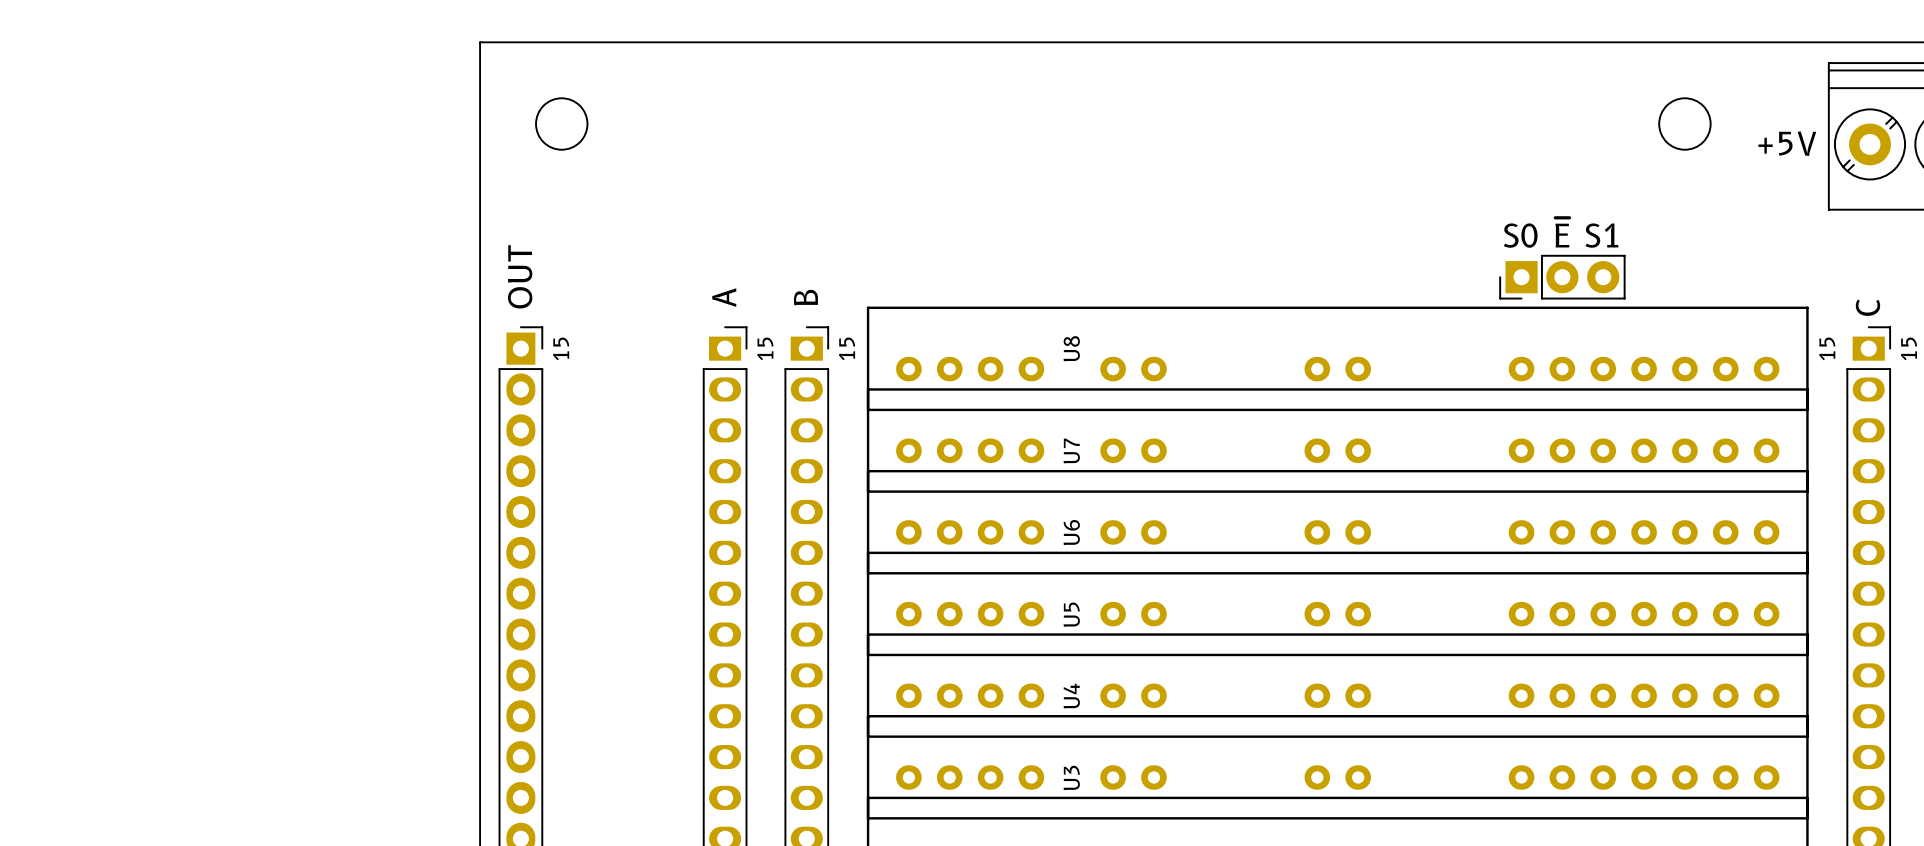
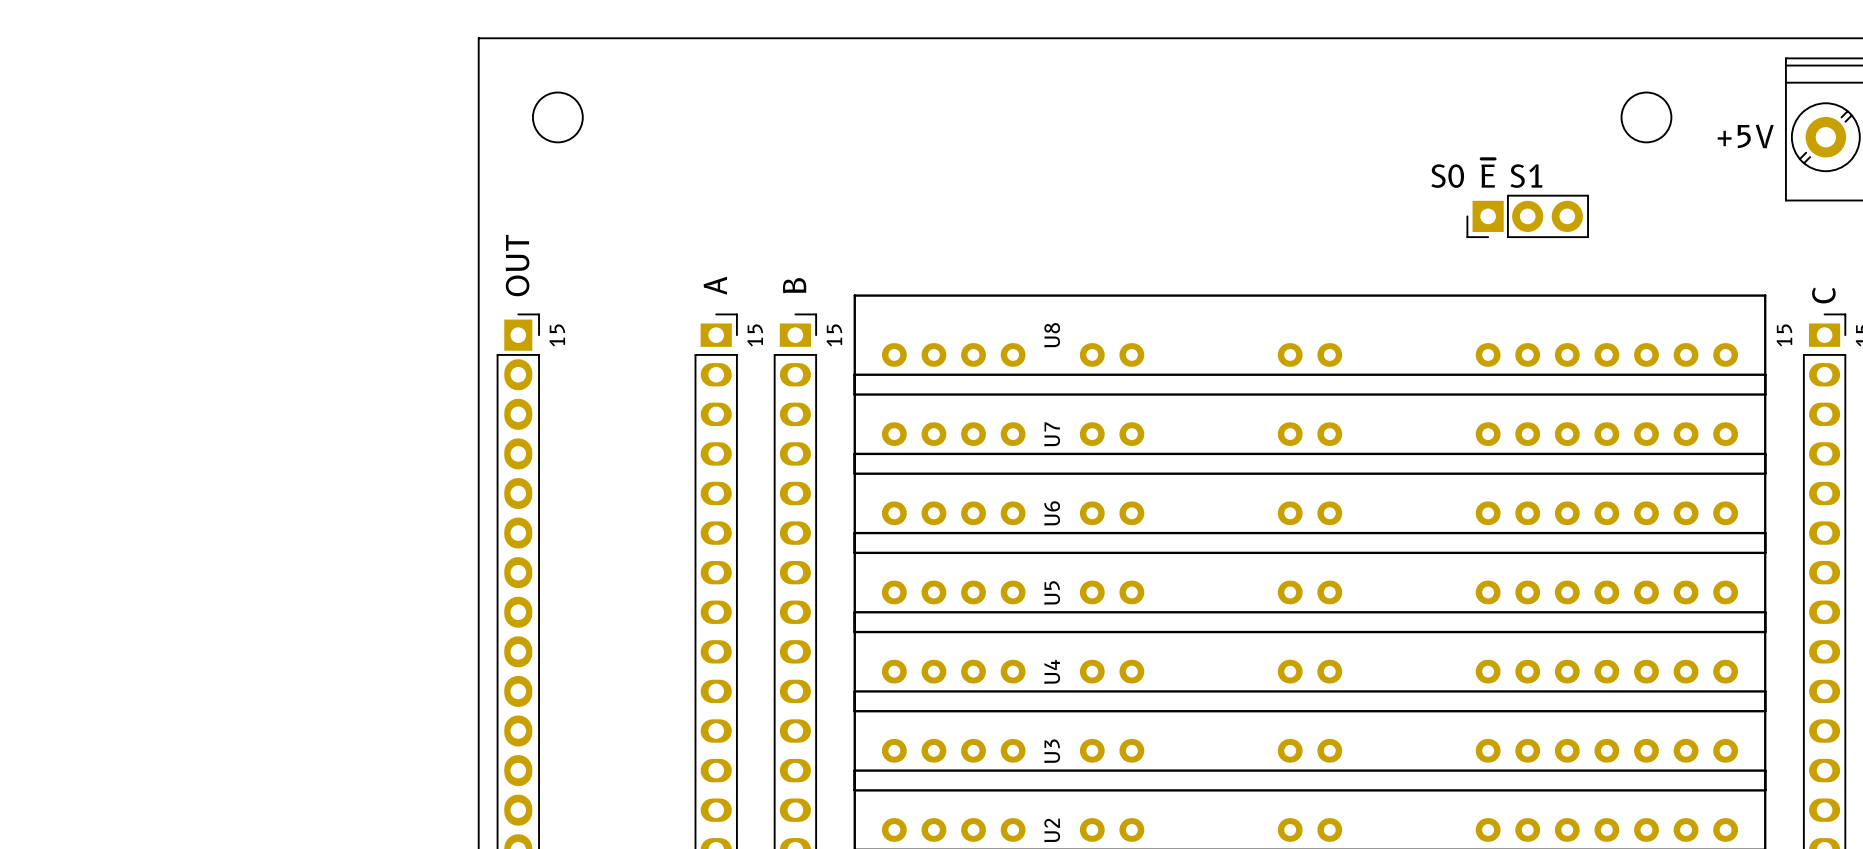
text position: ~{E} (1562, 232) -> ~{E} (1488, 173)
text position: S0 (1520, 235) -> S0 (1447, 176)
text position: S1 (1601, 235) -> S1 (1526, 176)
part position: (1562, 277) -> (1527, 216)

